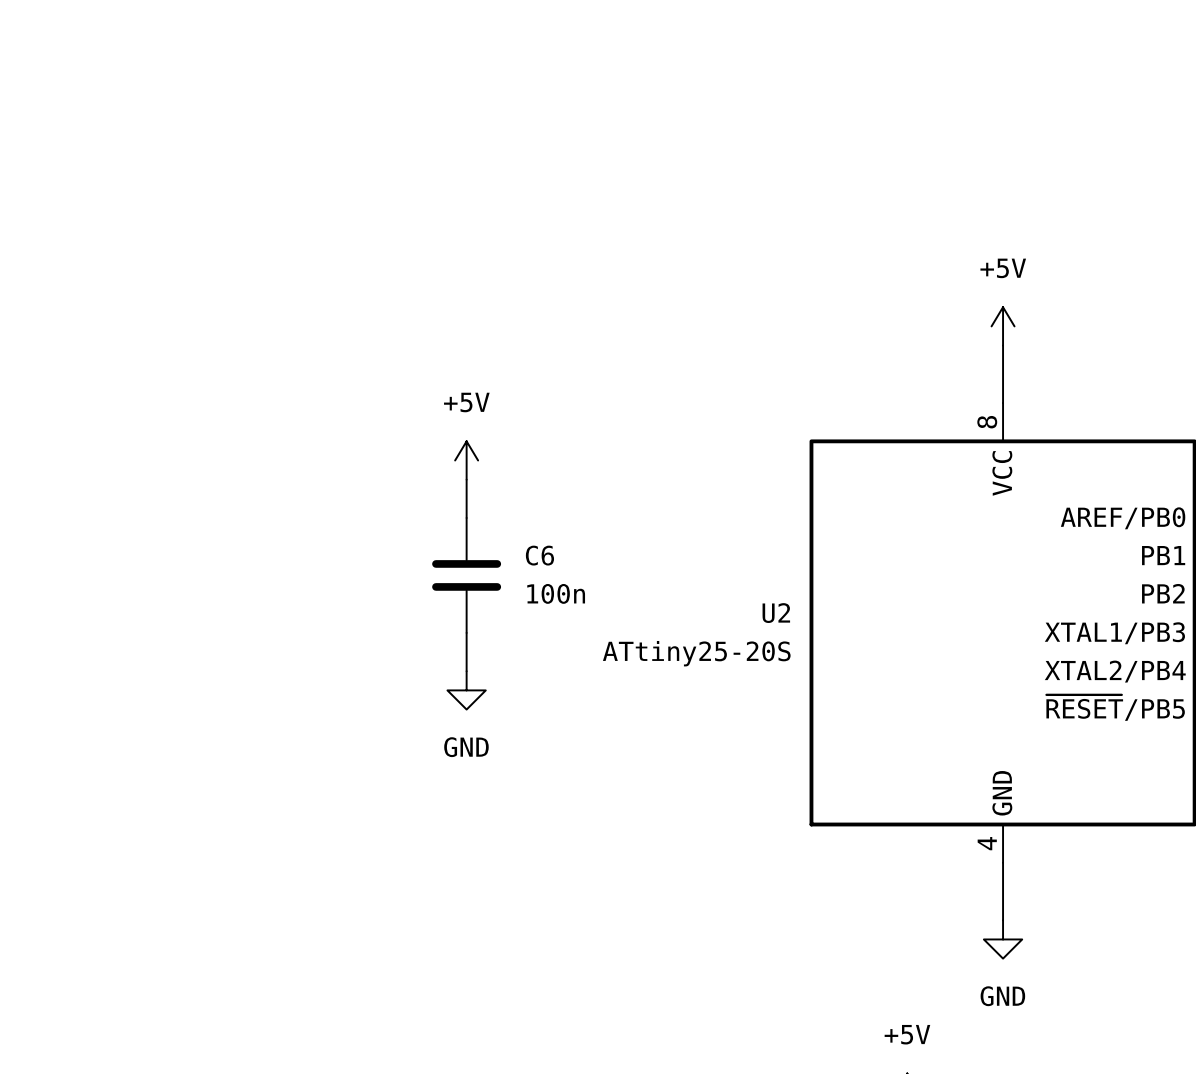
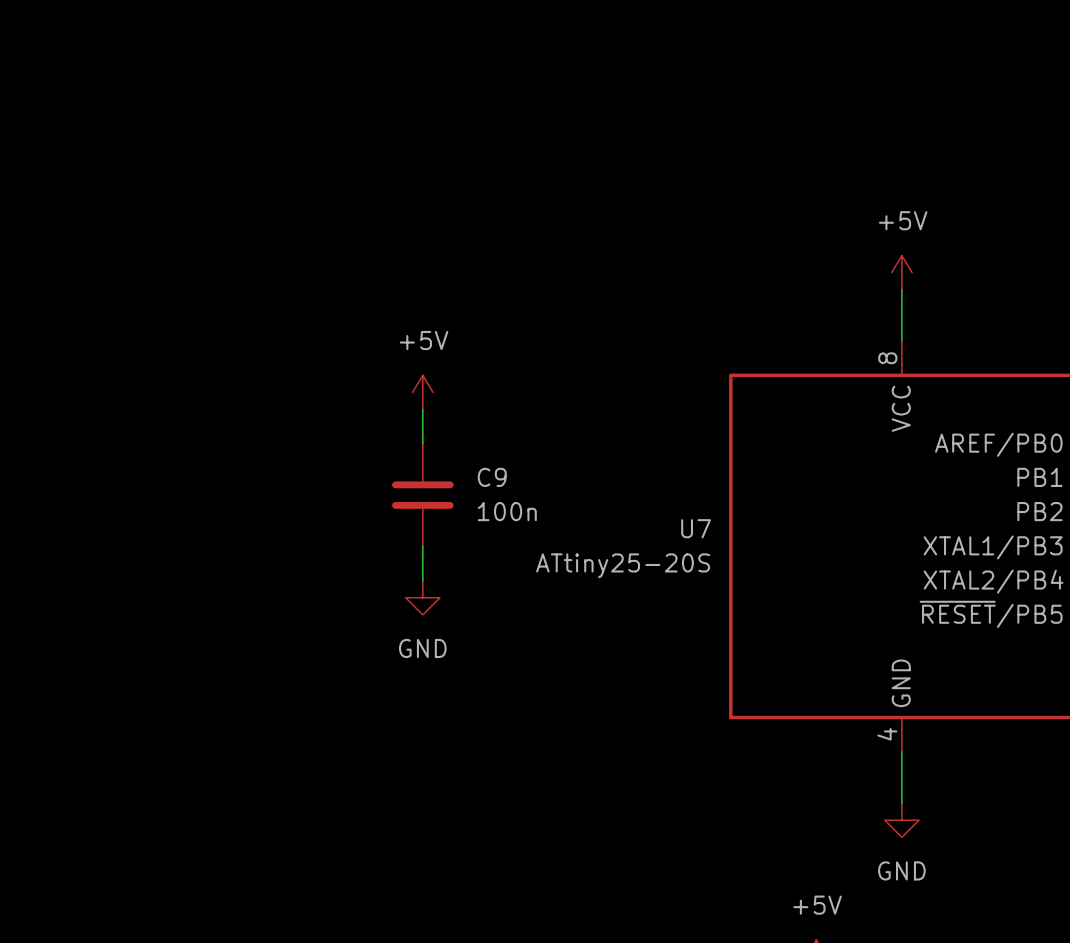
C6 name: C6 (539, 555) -> C9 (492, 477)
U2 name: U2 (776, 613) -> U7 (696, 528)

